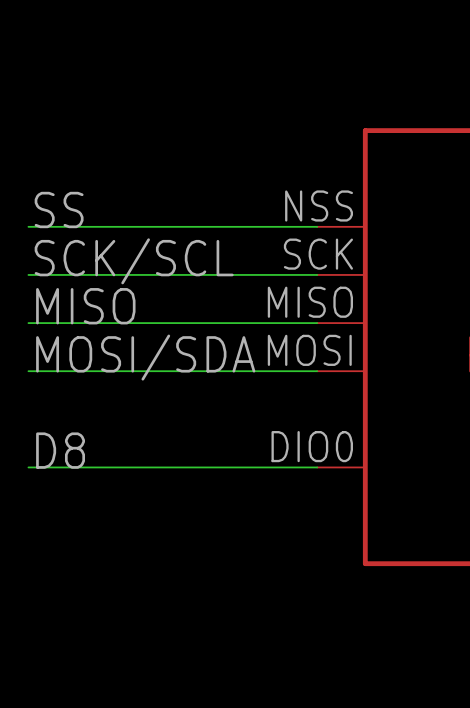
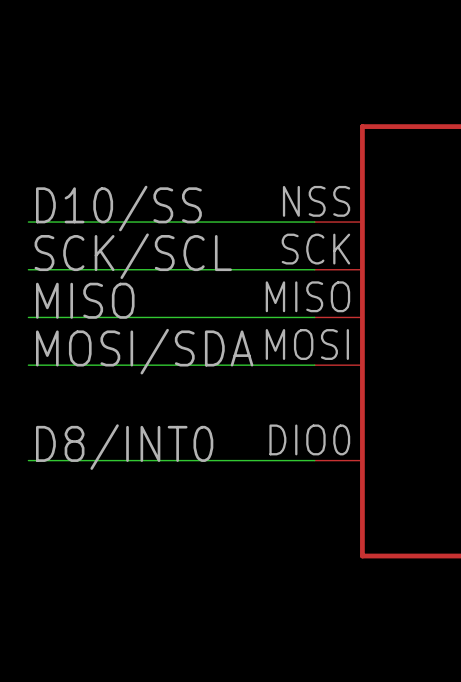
label: SS (59, 209) -> D10/SS (118, 208)
label: D8 (60, 450) -> D8/INT0 (124, 447)

